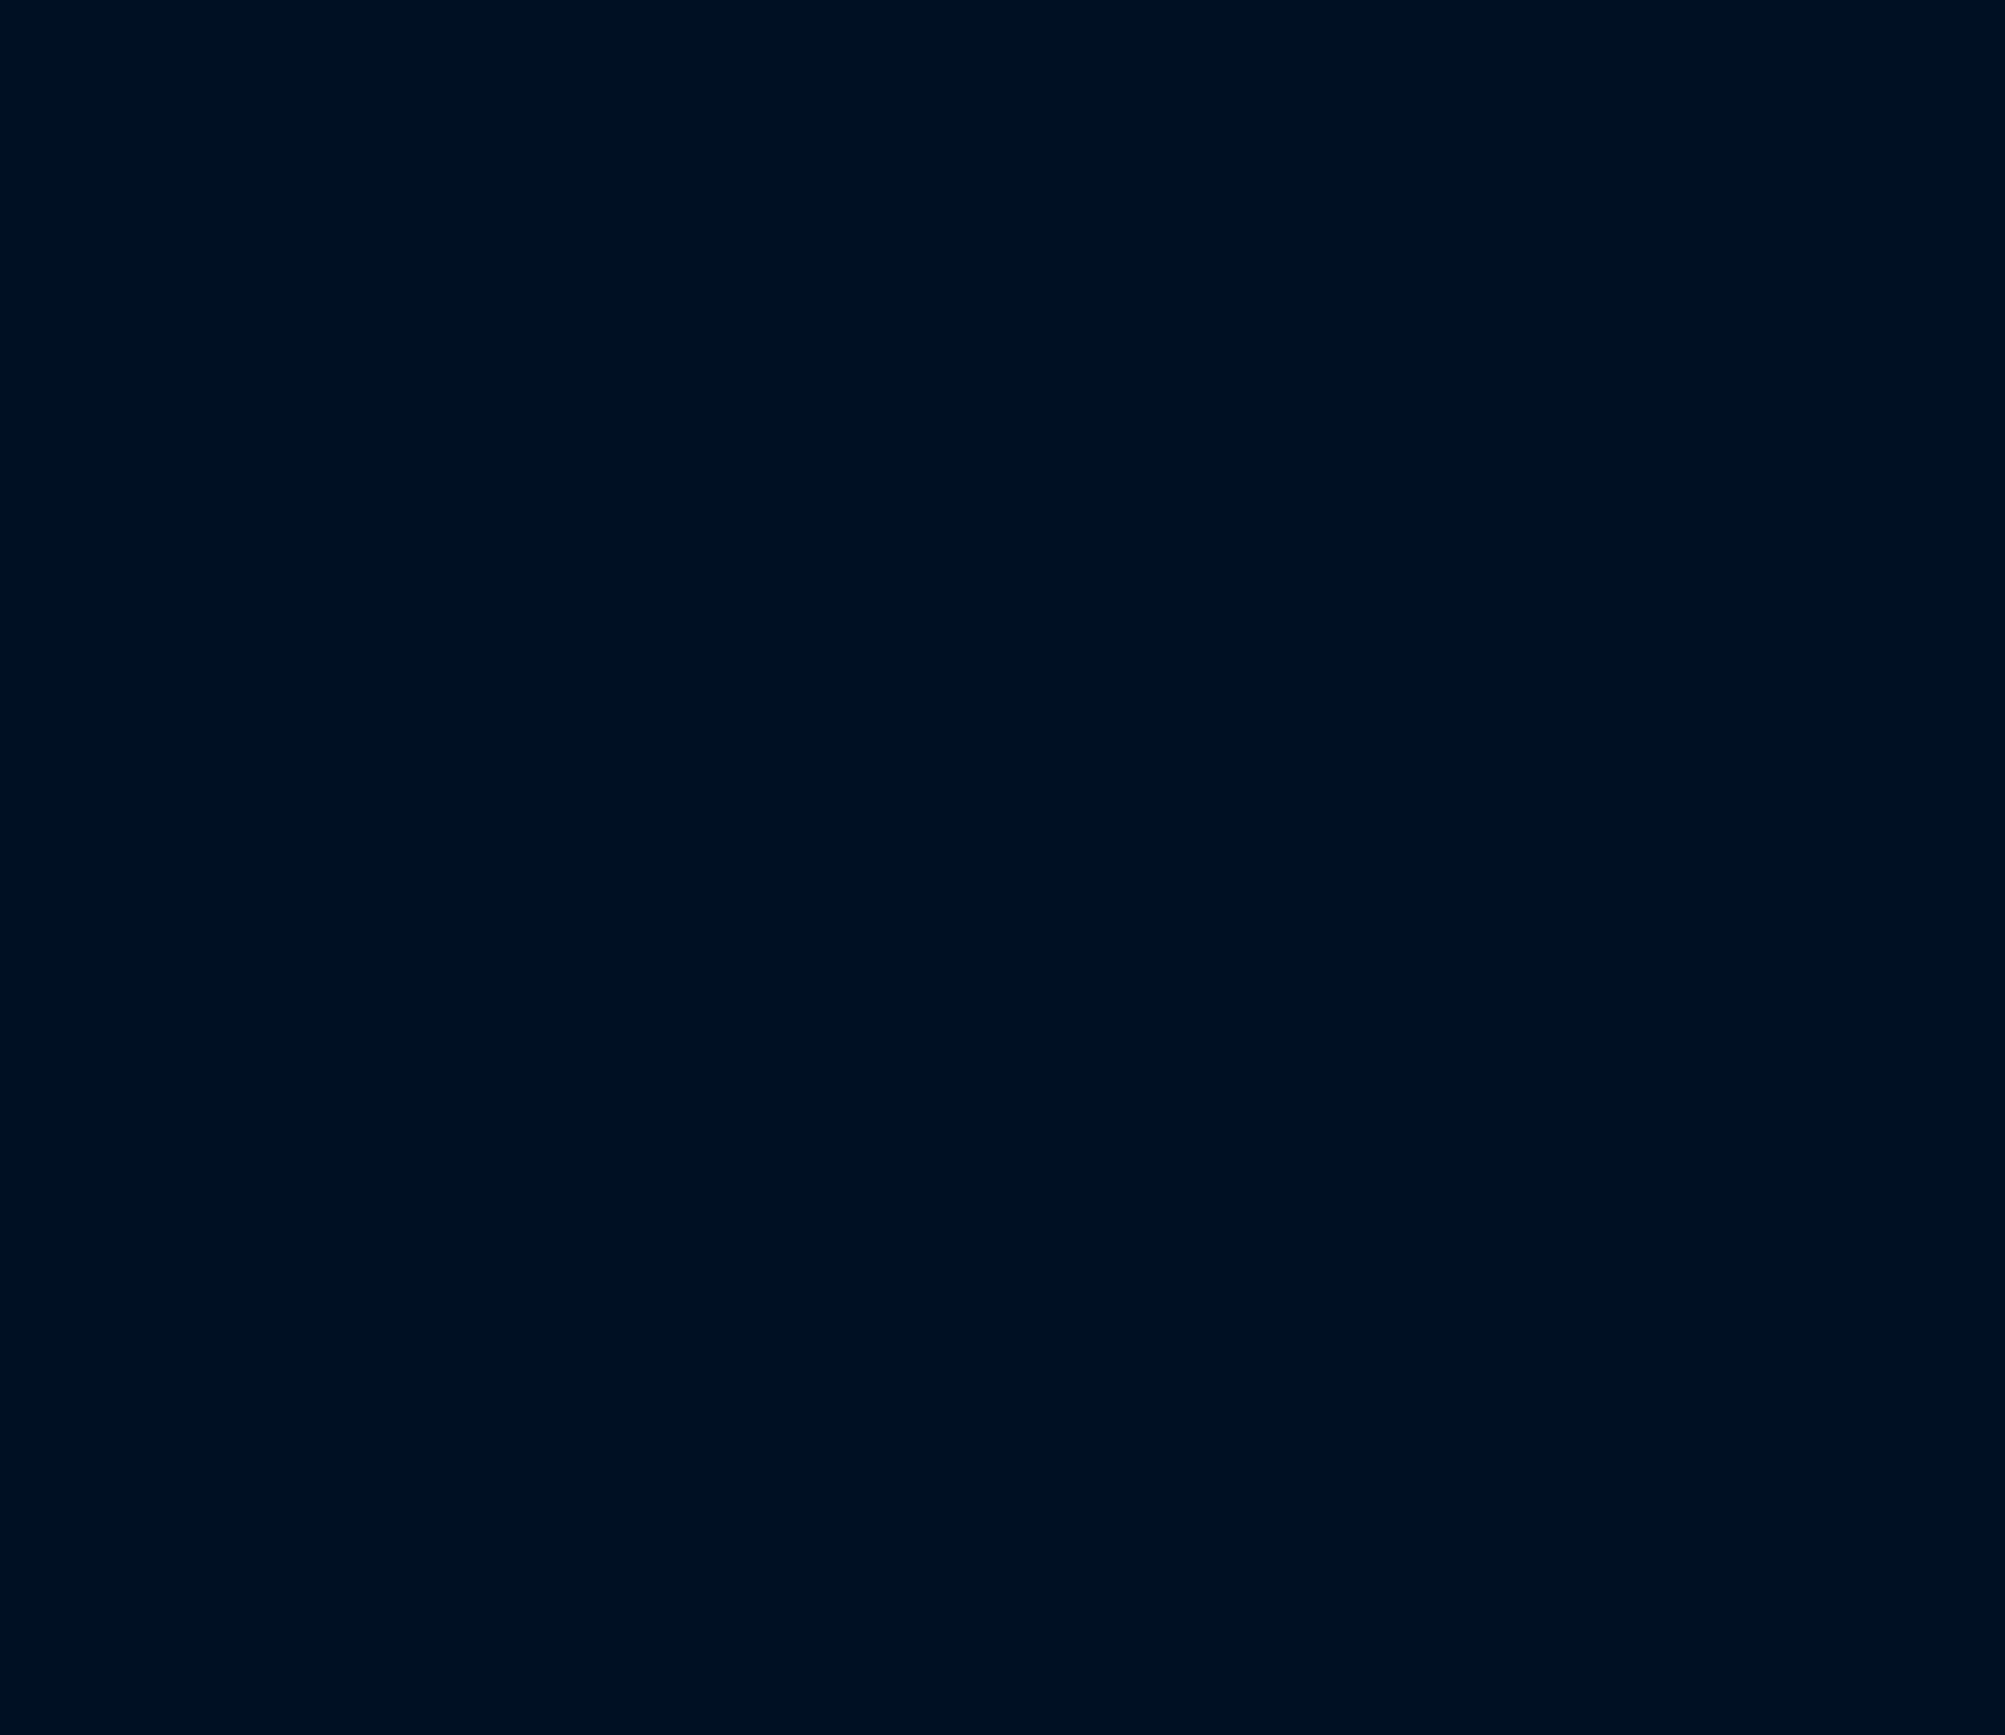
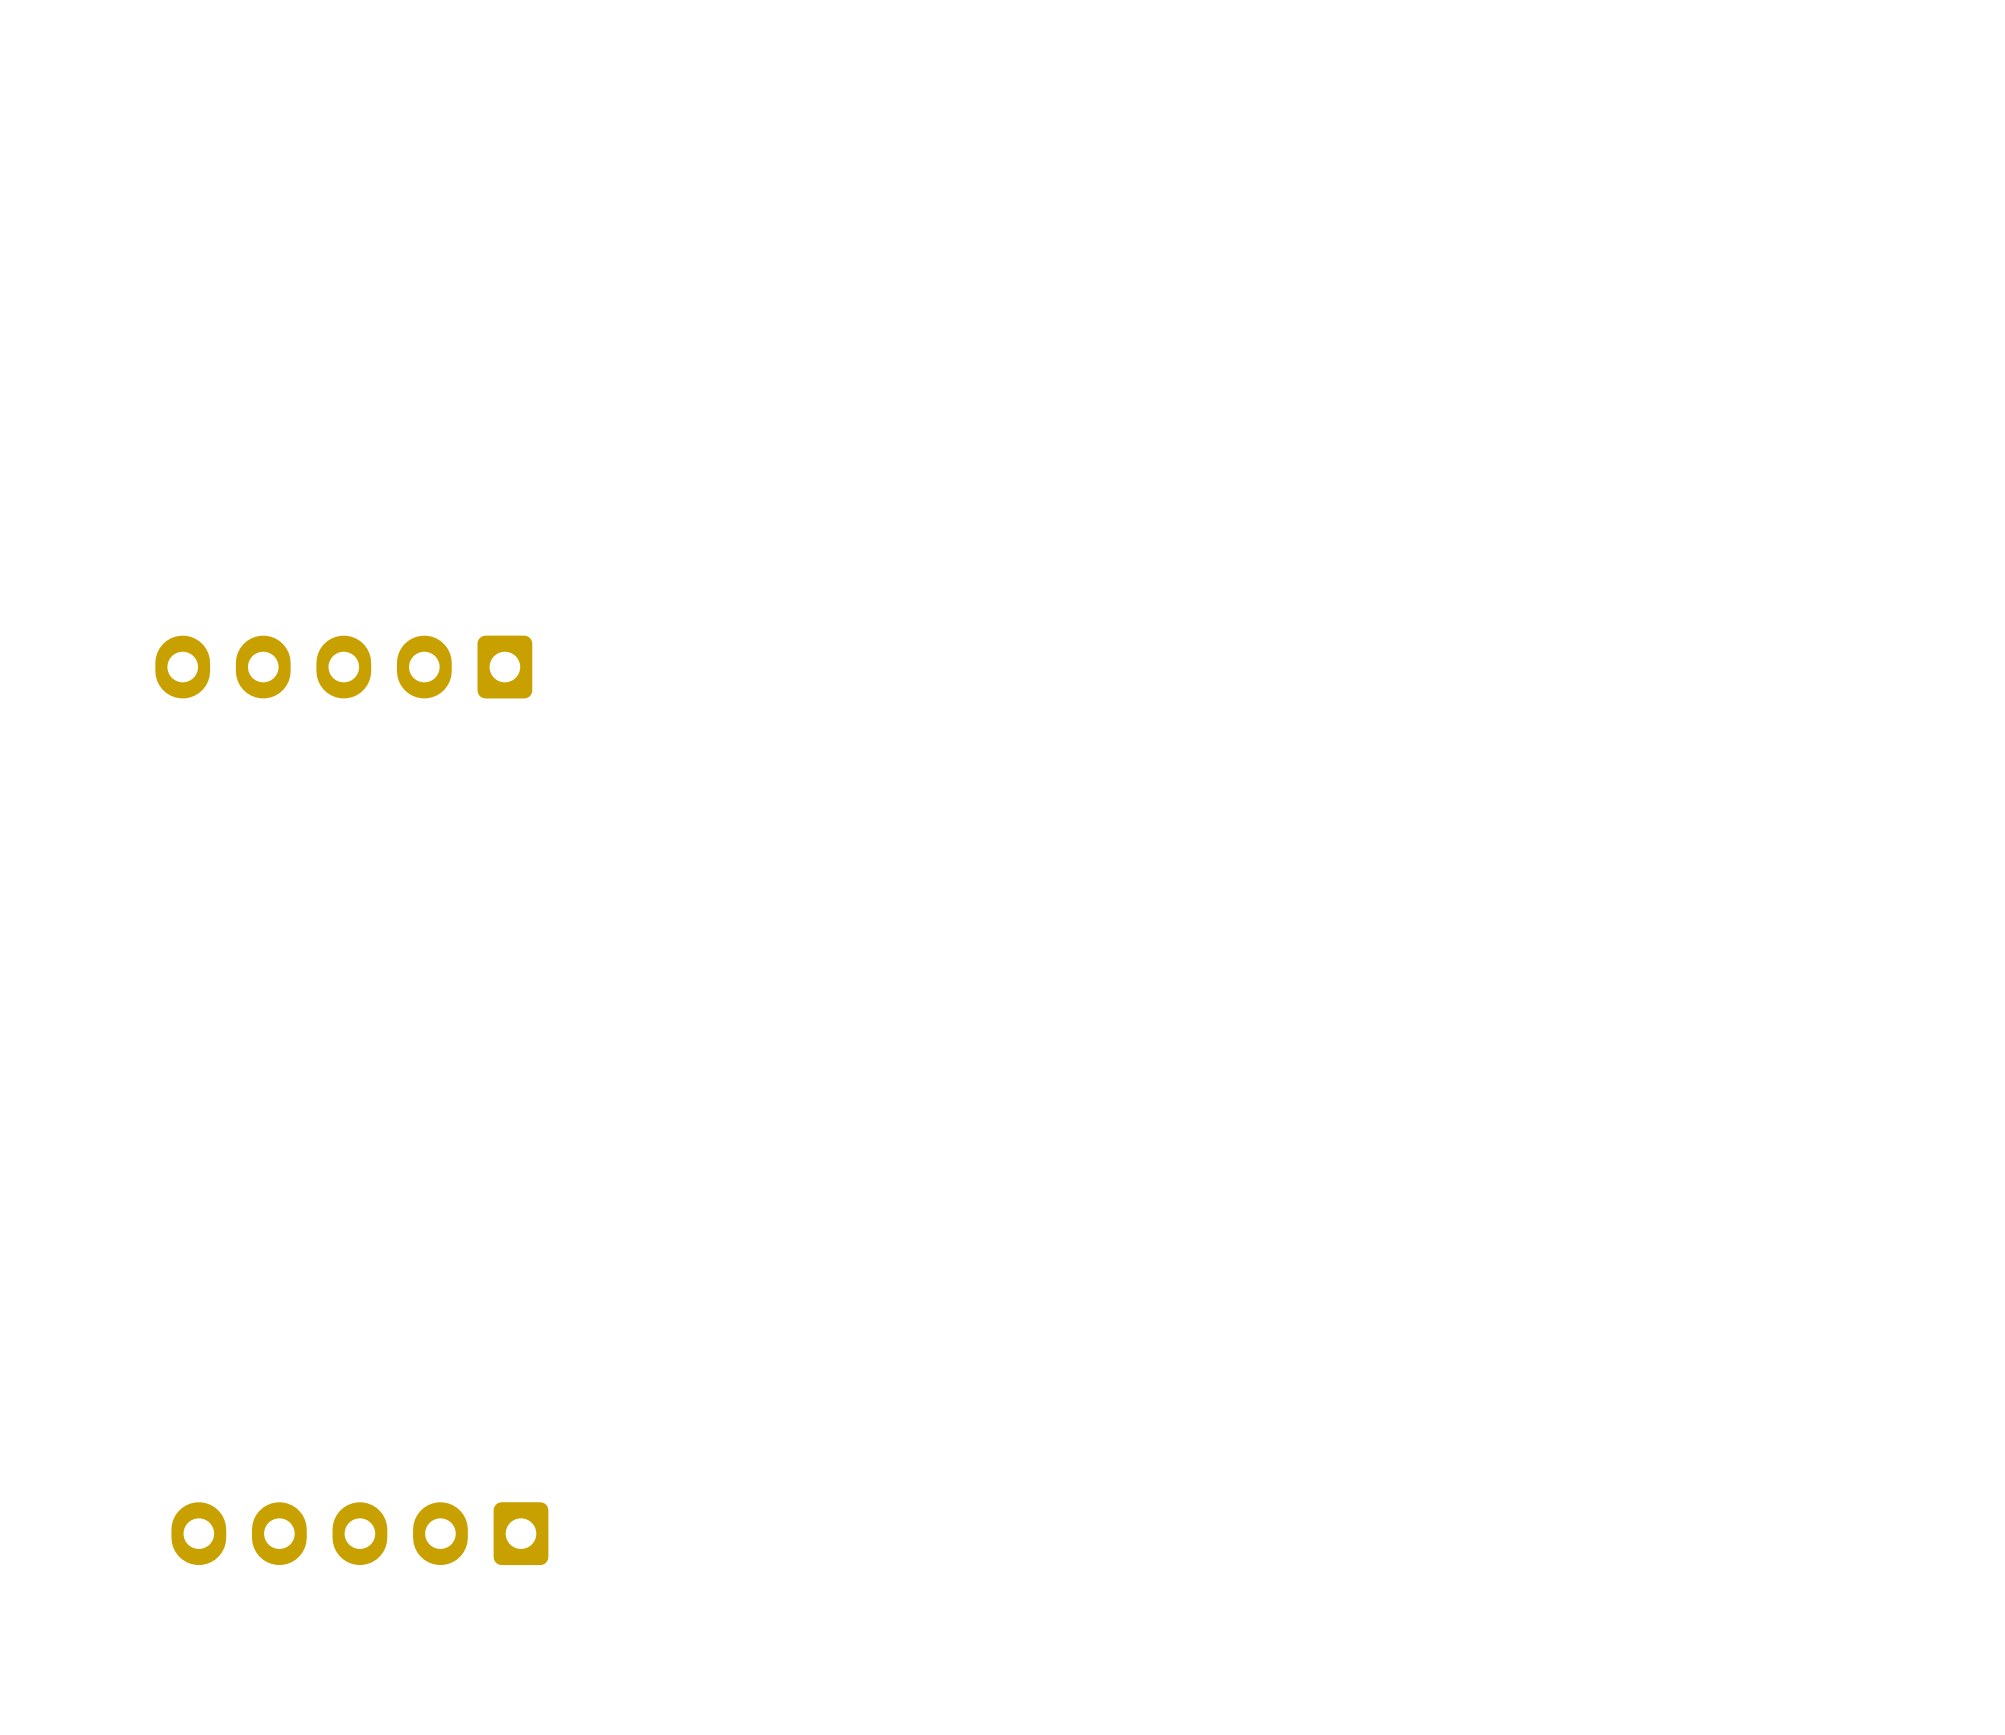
part: none -> (343, 667)
part: none -> (359, 1533)

